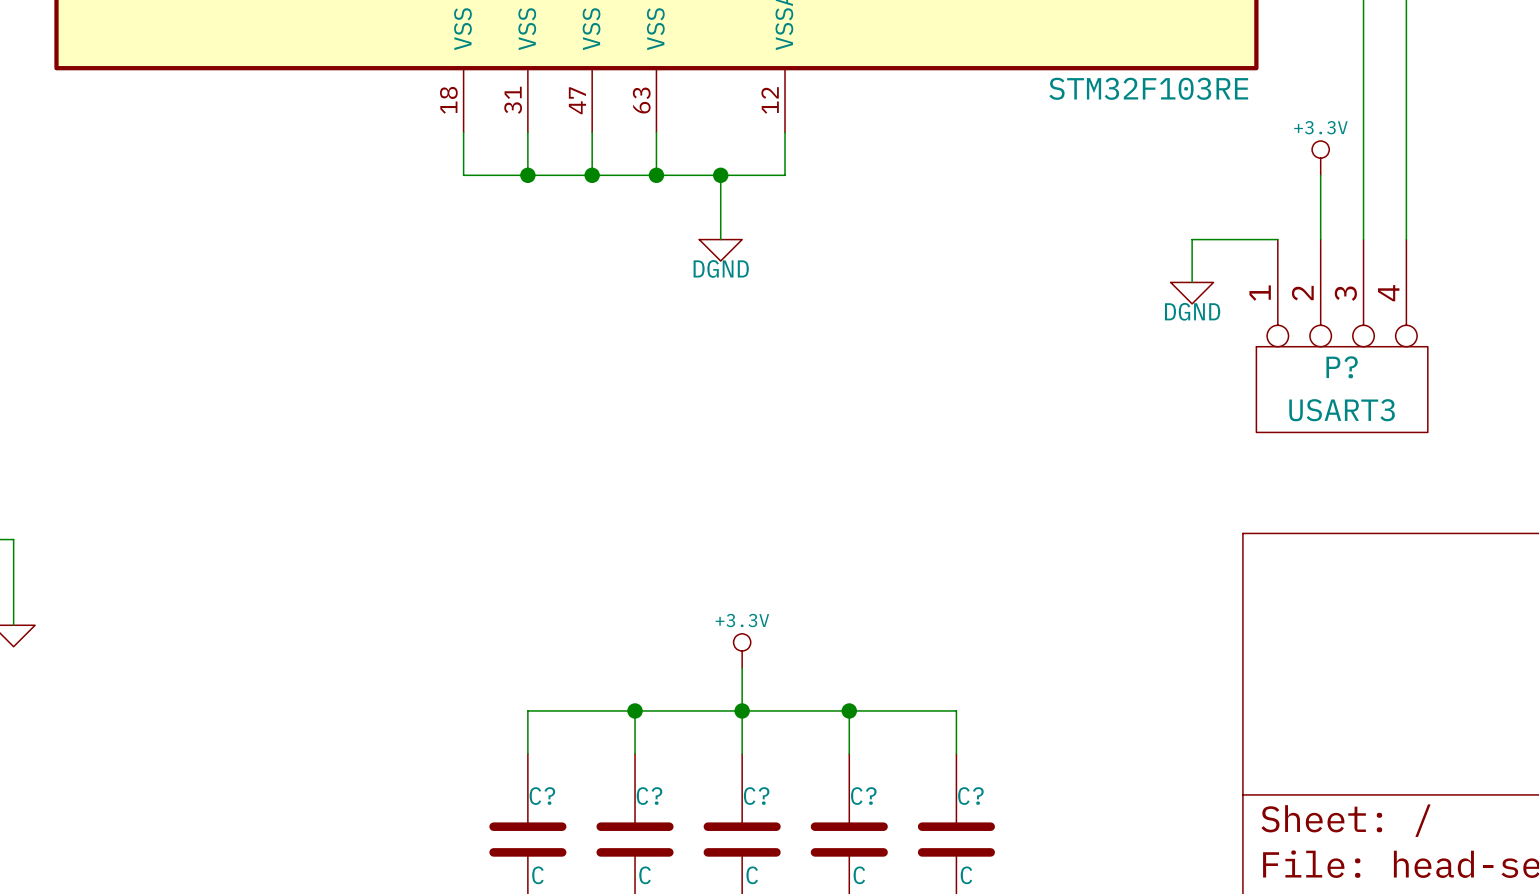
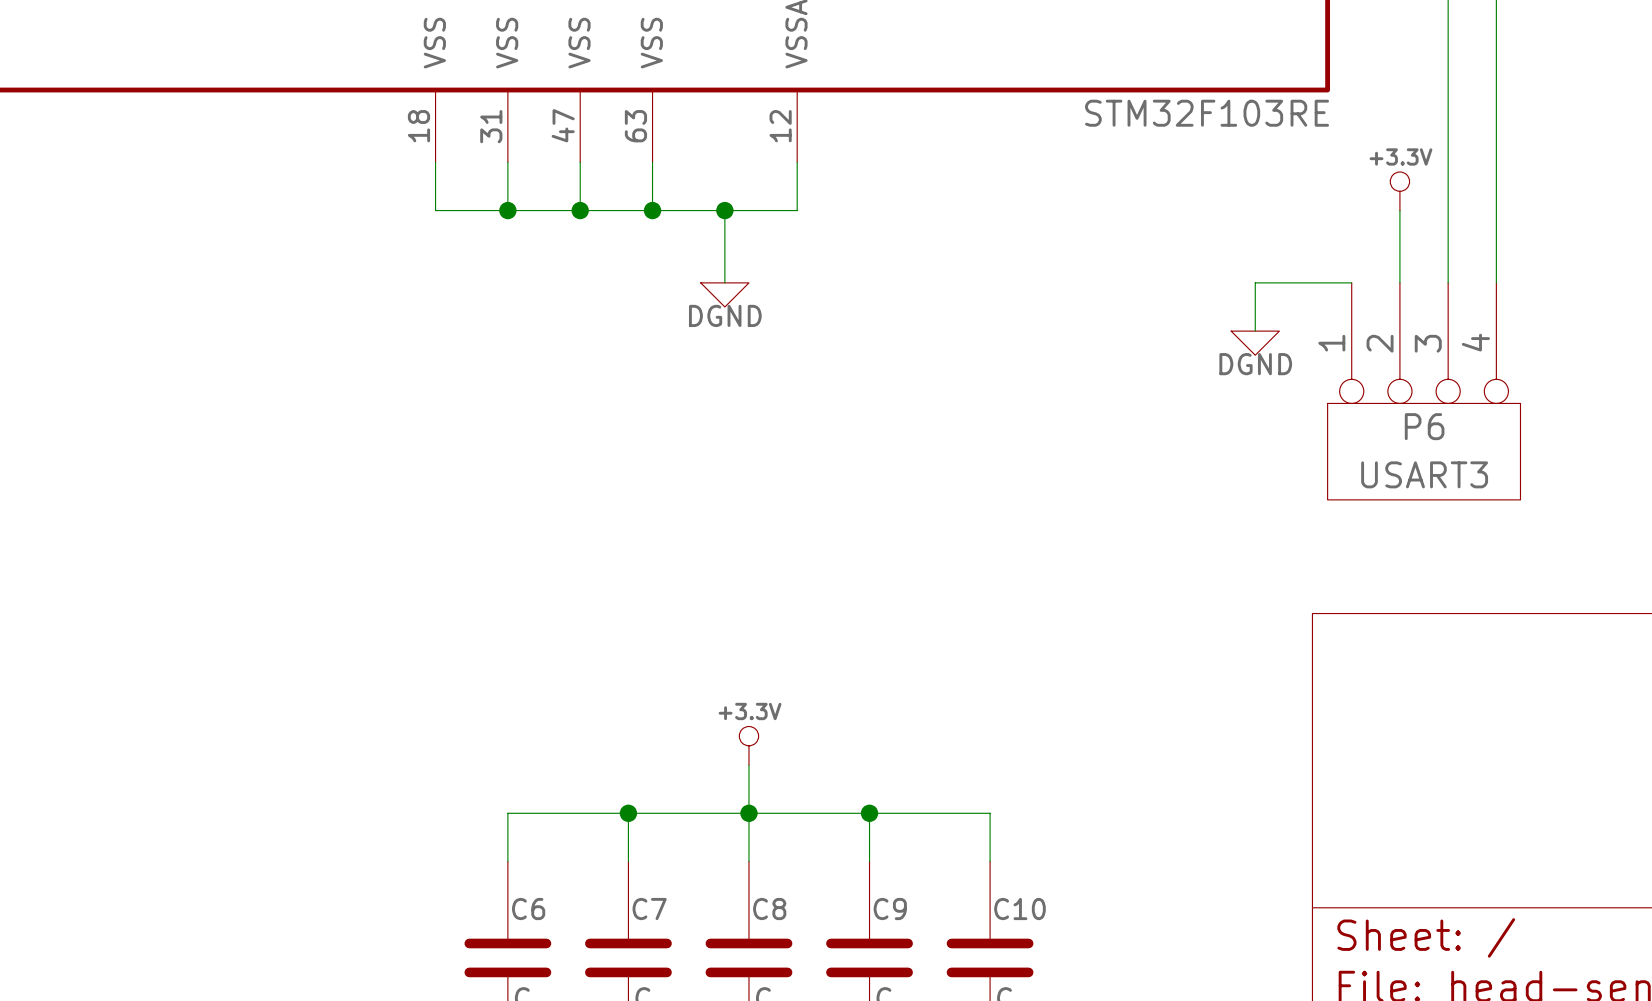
P? name: P? (1342, 367) -> P6 (1424, 426)
C? name: C? (542, 796) -> C6 (528, 909)
C? name: C? (649, 796) -> C7 (649, 909)
C? name: C? (756, 796) -> C8 (769, 909)
C? name: C? (863, 796) -> C9 (890, 909)
C? name: C? (970, 796) -> C10 (1019, 909)

